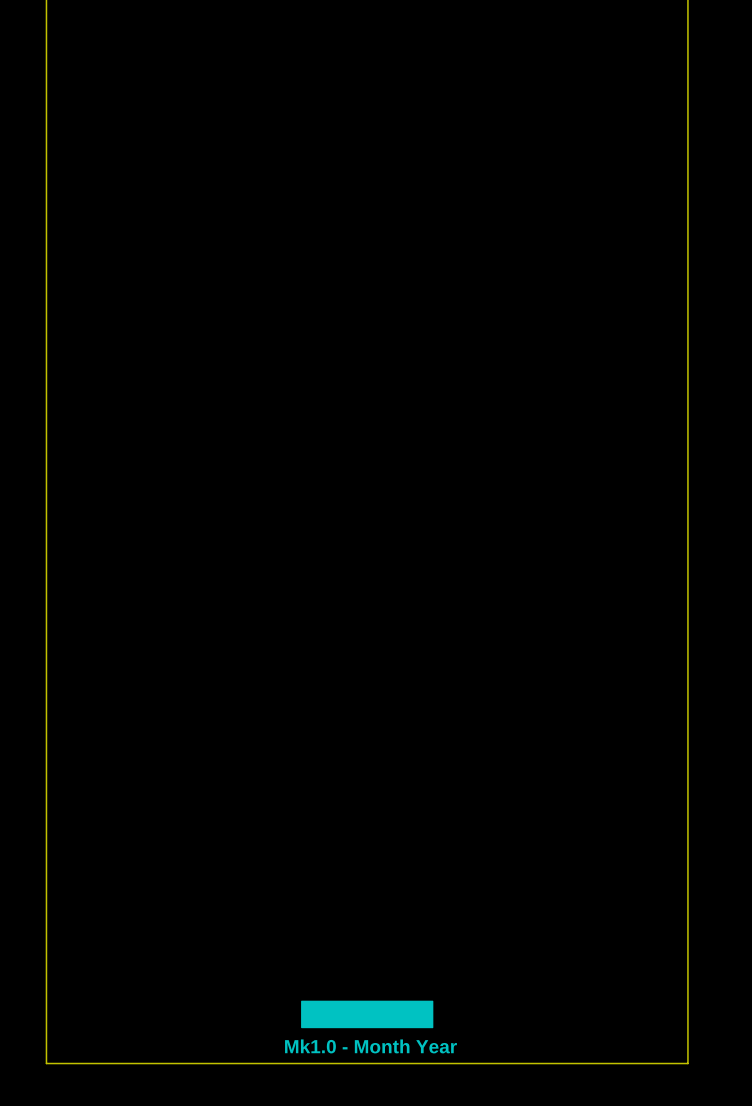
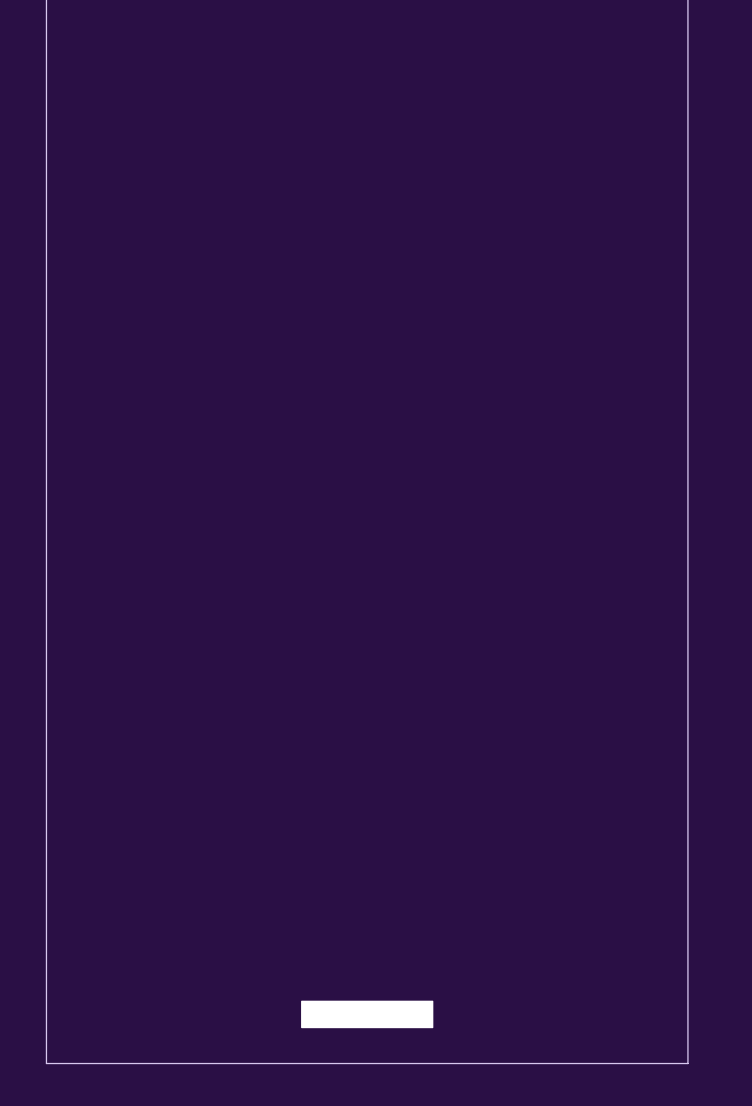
text: Mk1.0 - Month Year (370, 1046) -> none

